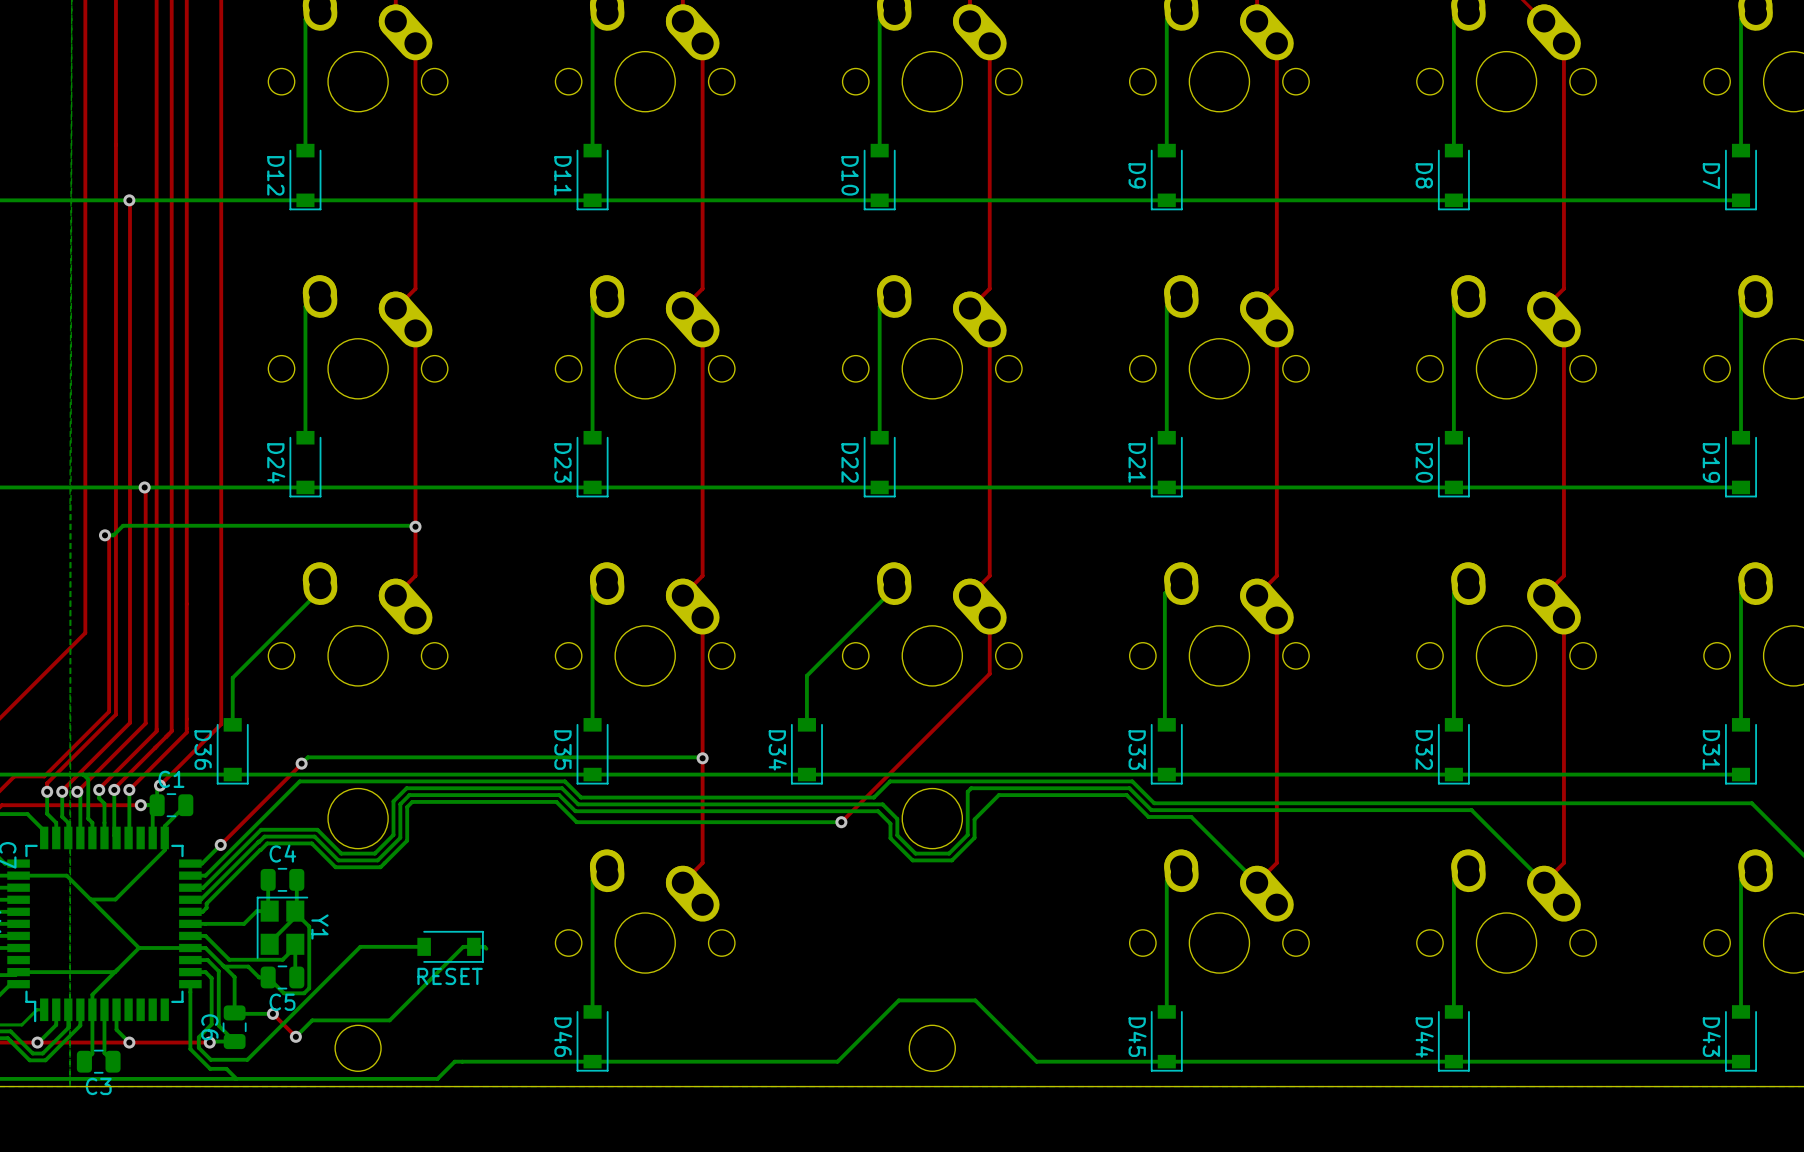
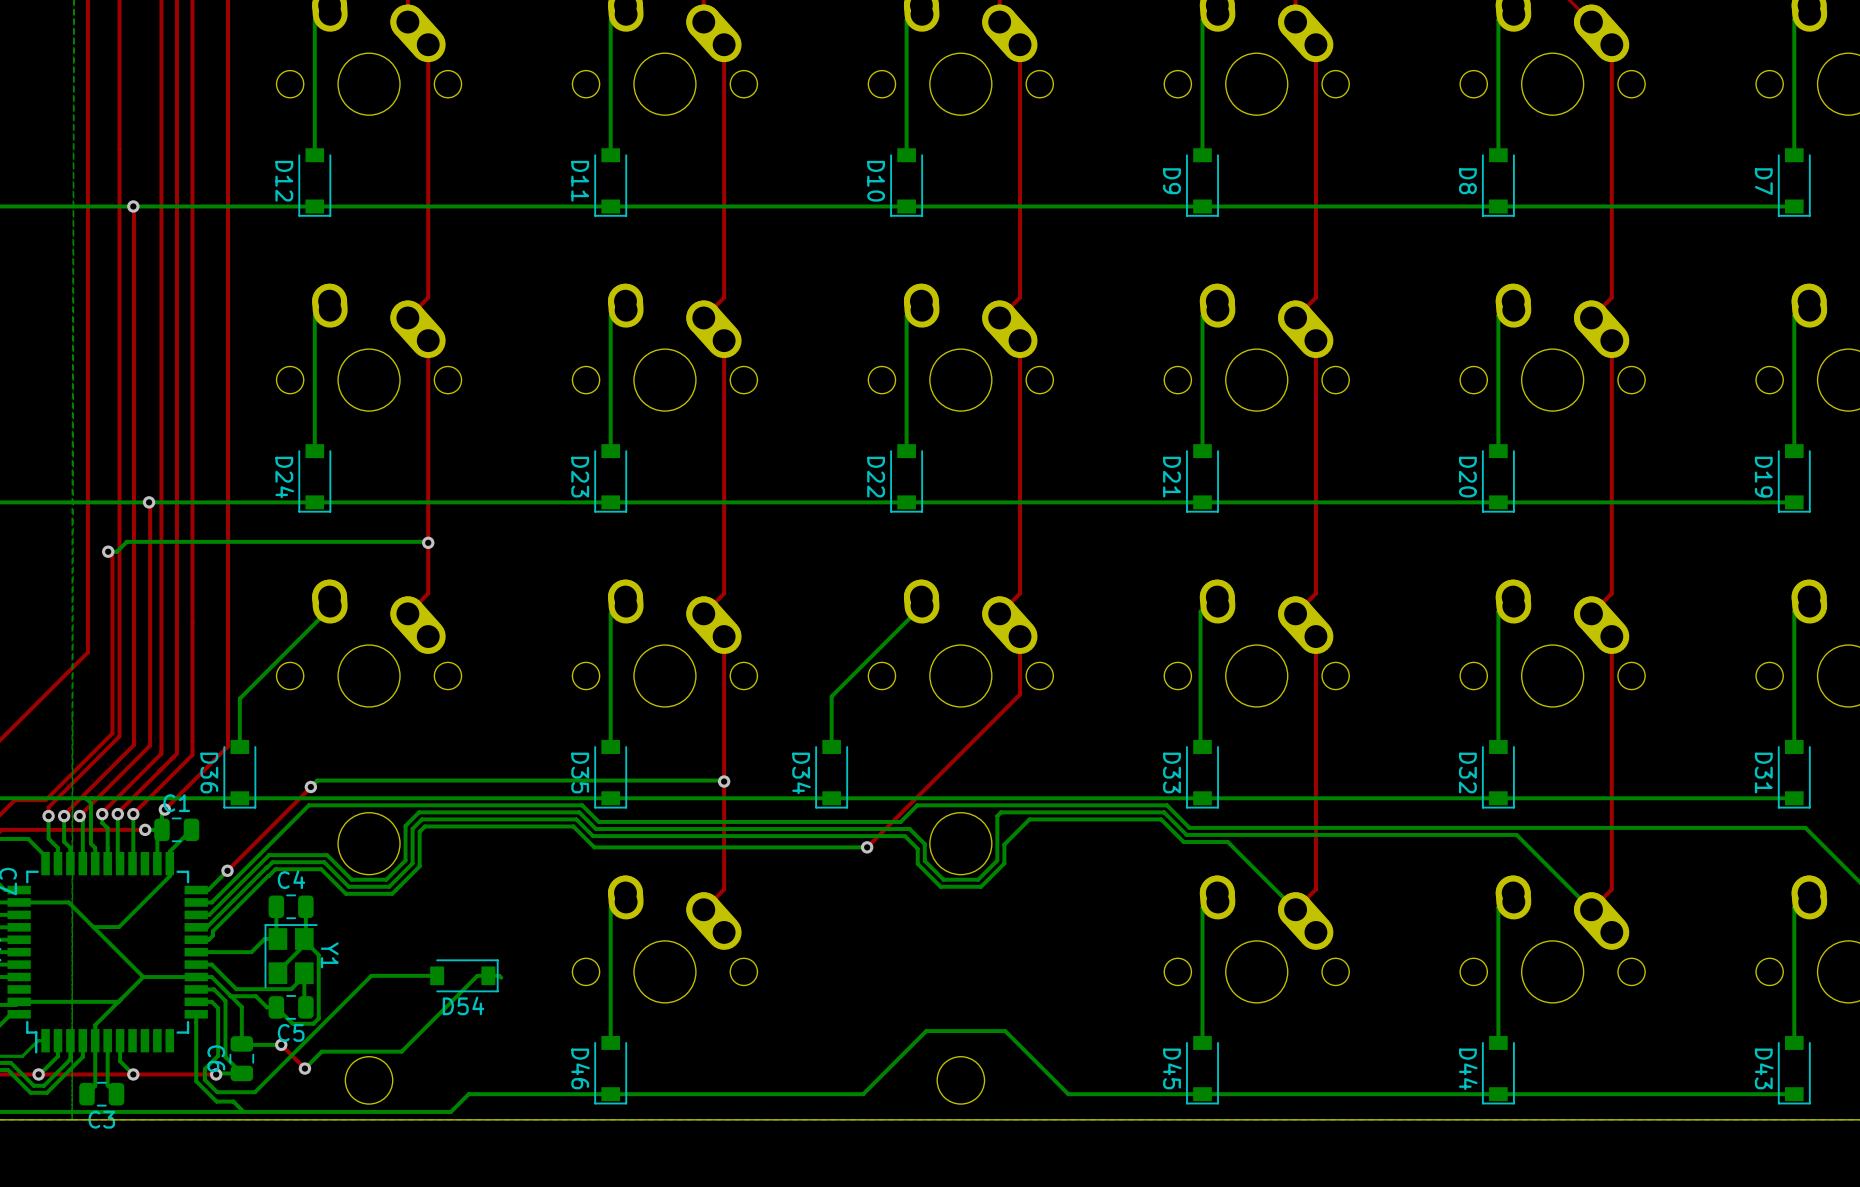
RESET name: RESET (450, 976) -> D54 (463, 1005)

